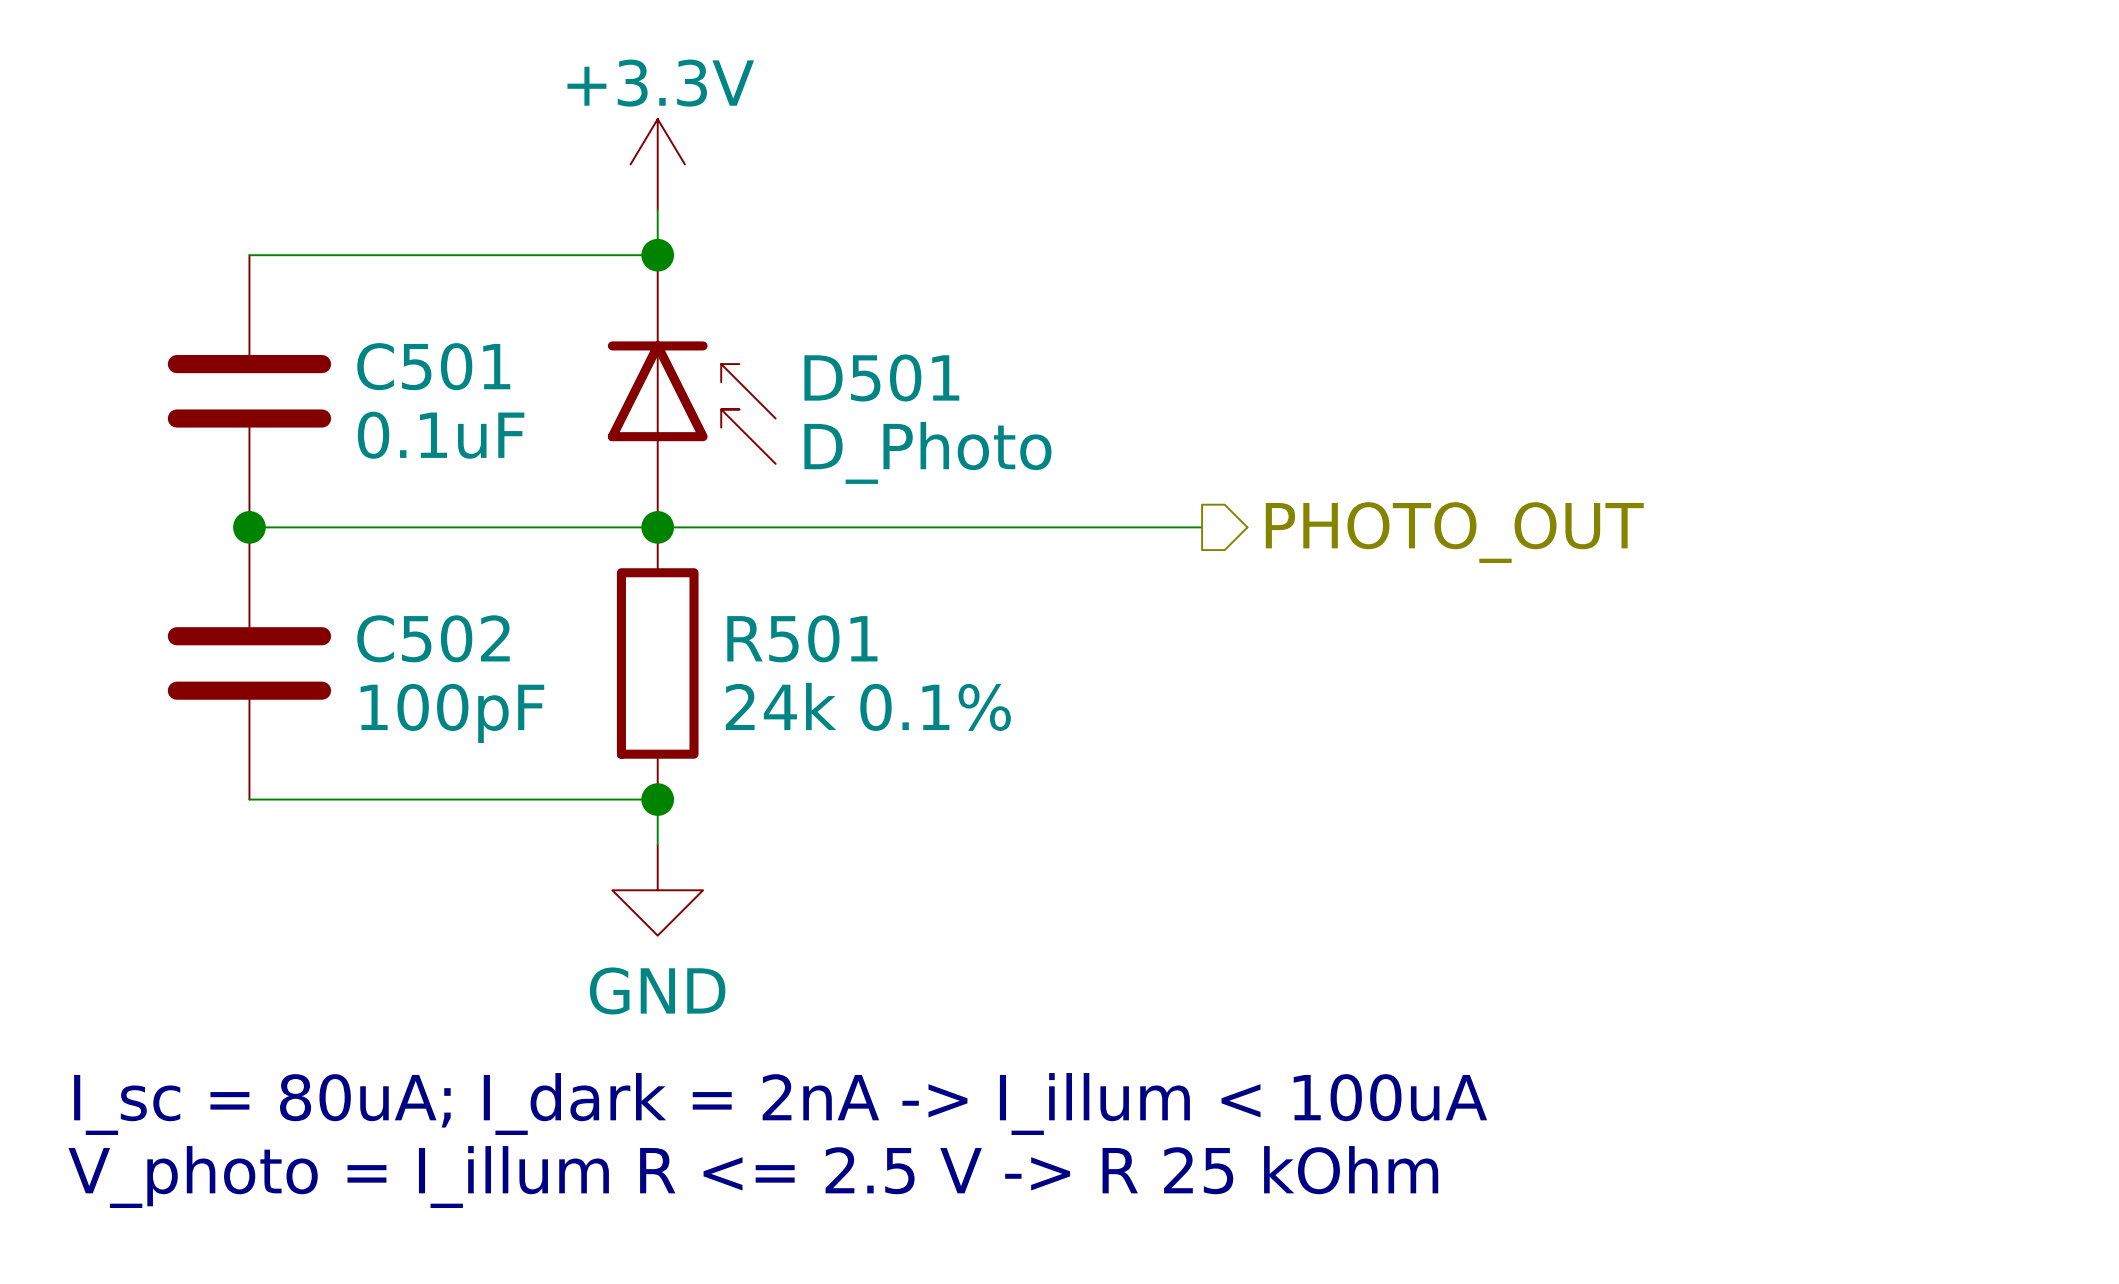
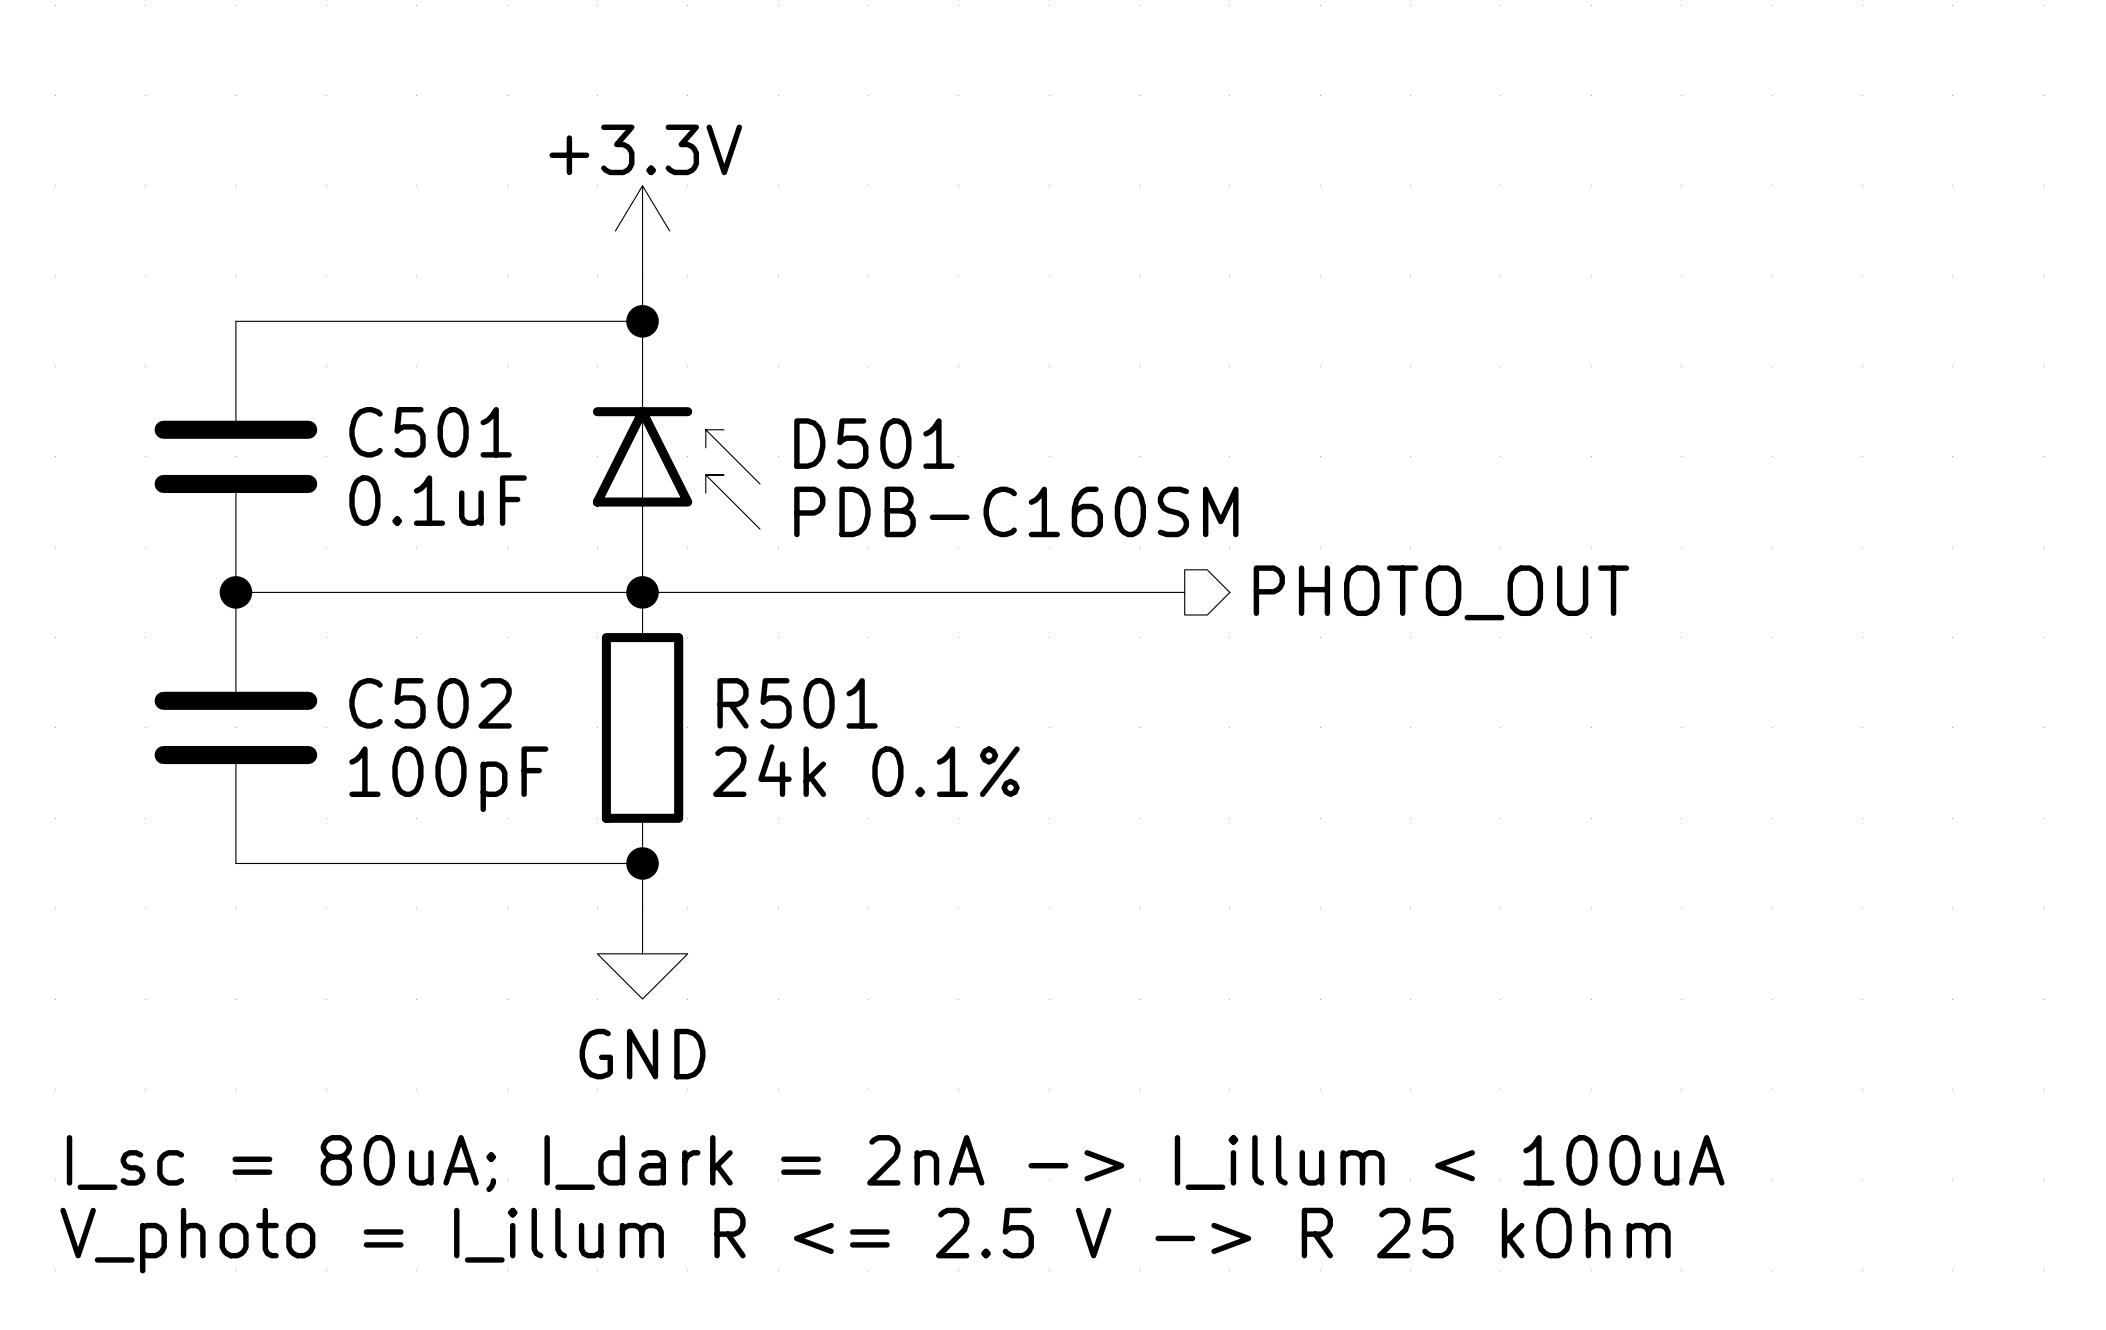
D501 value: D_Photo (927, 452) -> PDB-C160SM (1016, 511)

